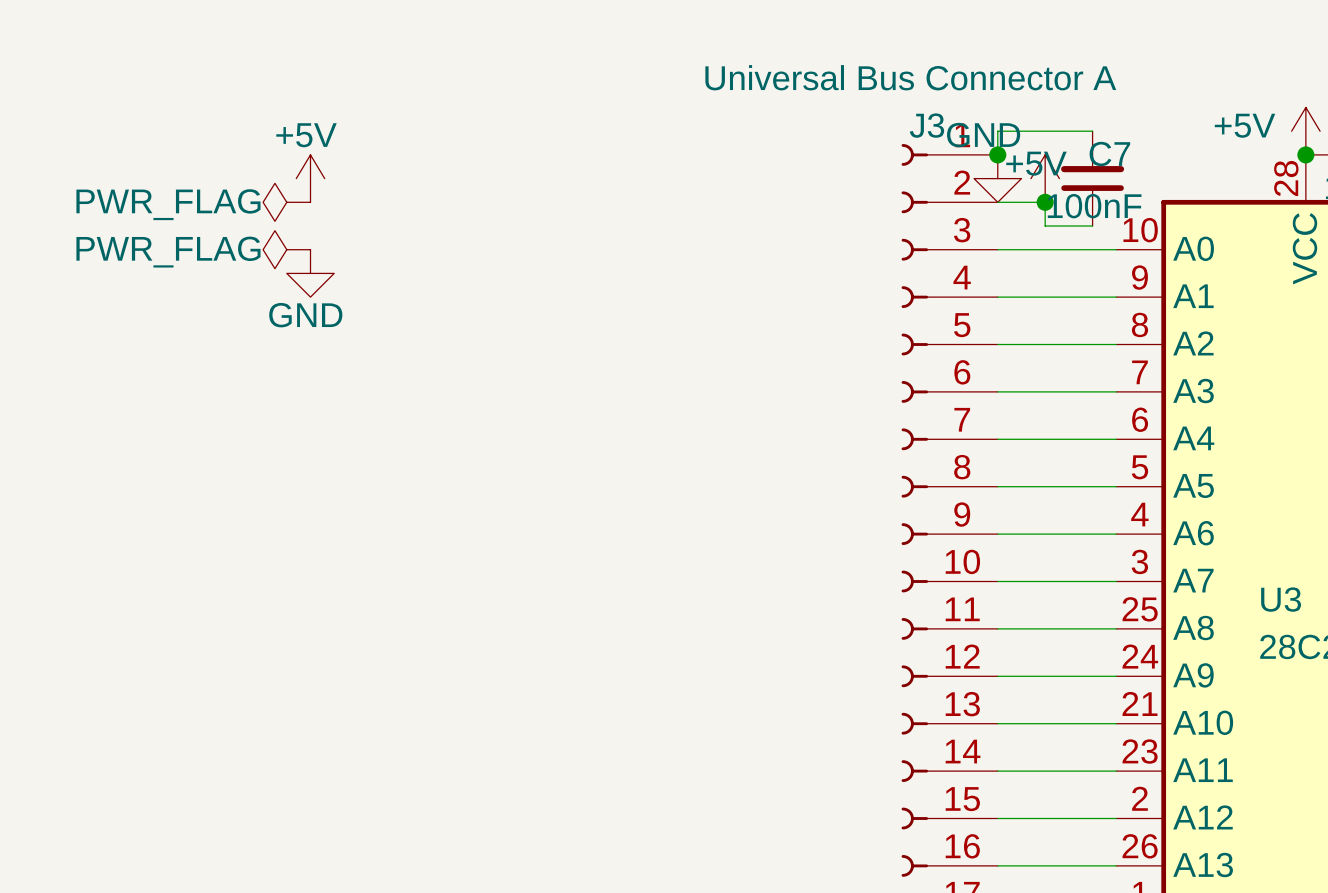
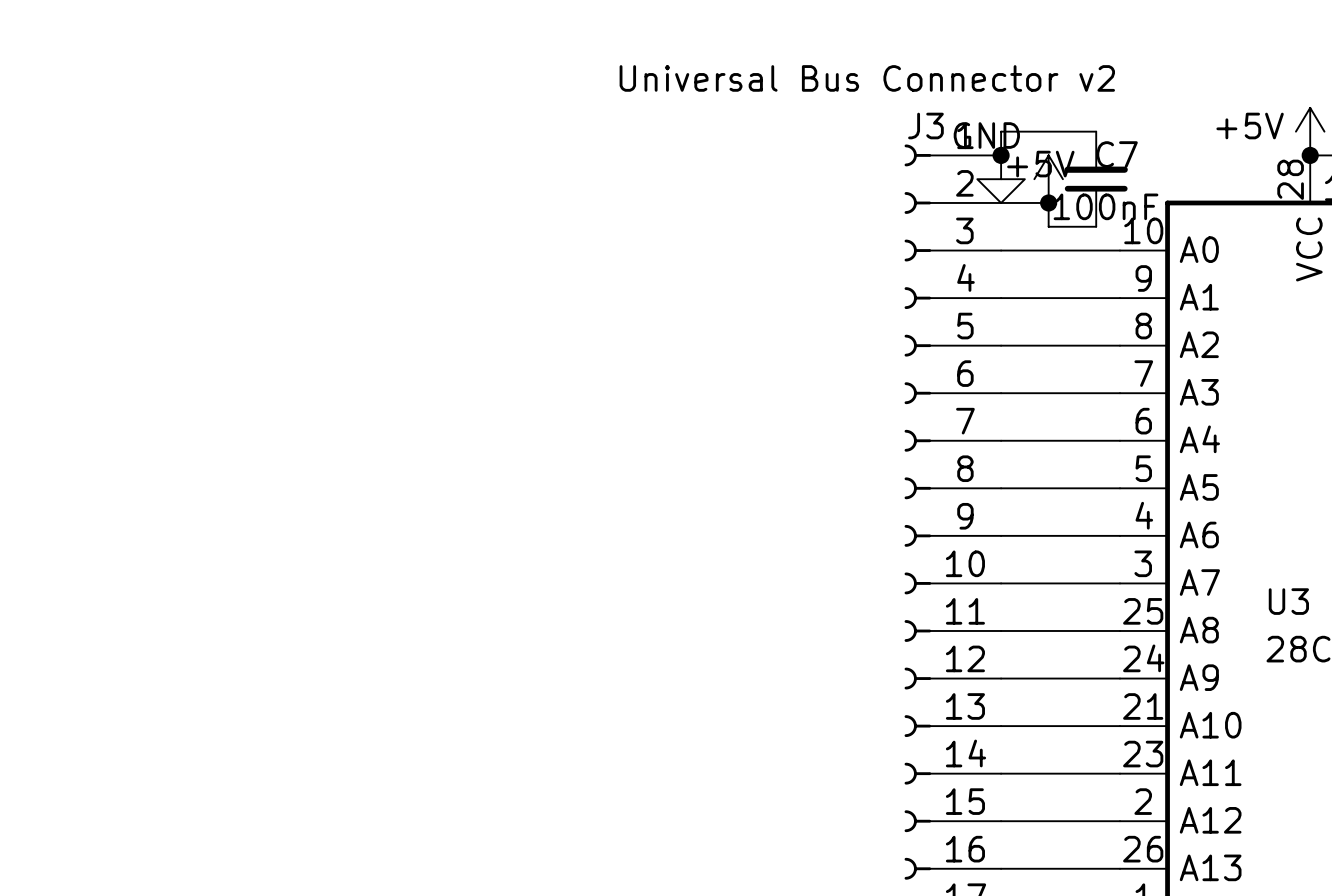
J3 value: Universal Bus Connector A (910, 77) -> Universal Bus Connector v2 (867, 78)
power symbol: +5V (310, 178) -> none
power symbol: PWR_FLAG (286, 202) -> none
power symbol: PWR_FLAG (286, 249) -> none
power symbol: GND (310, 273) -> none

